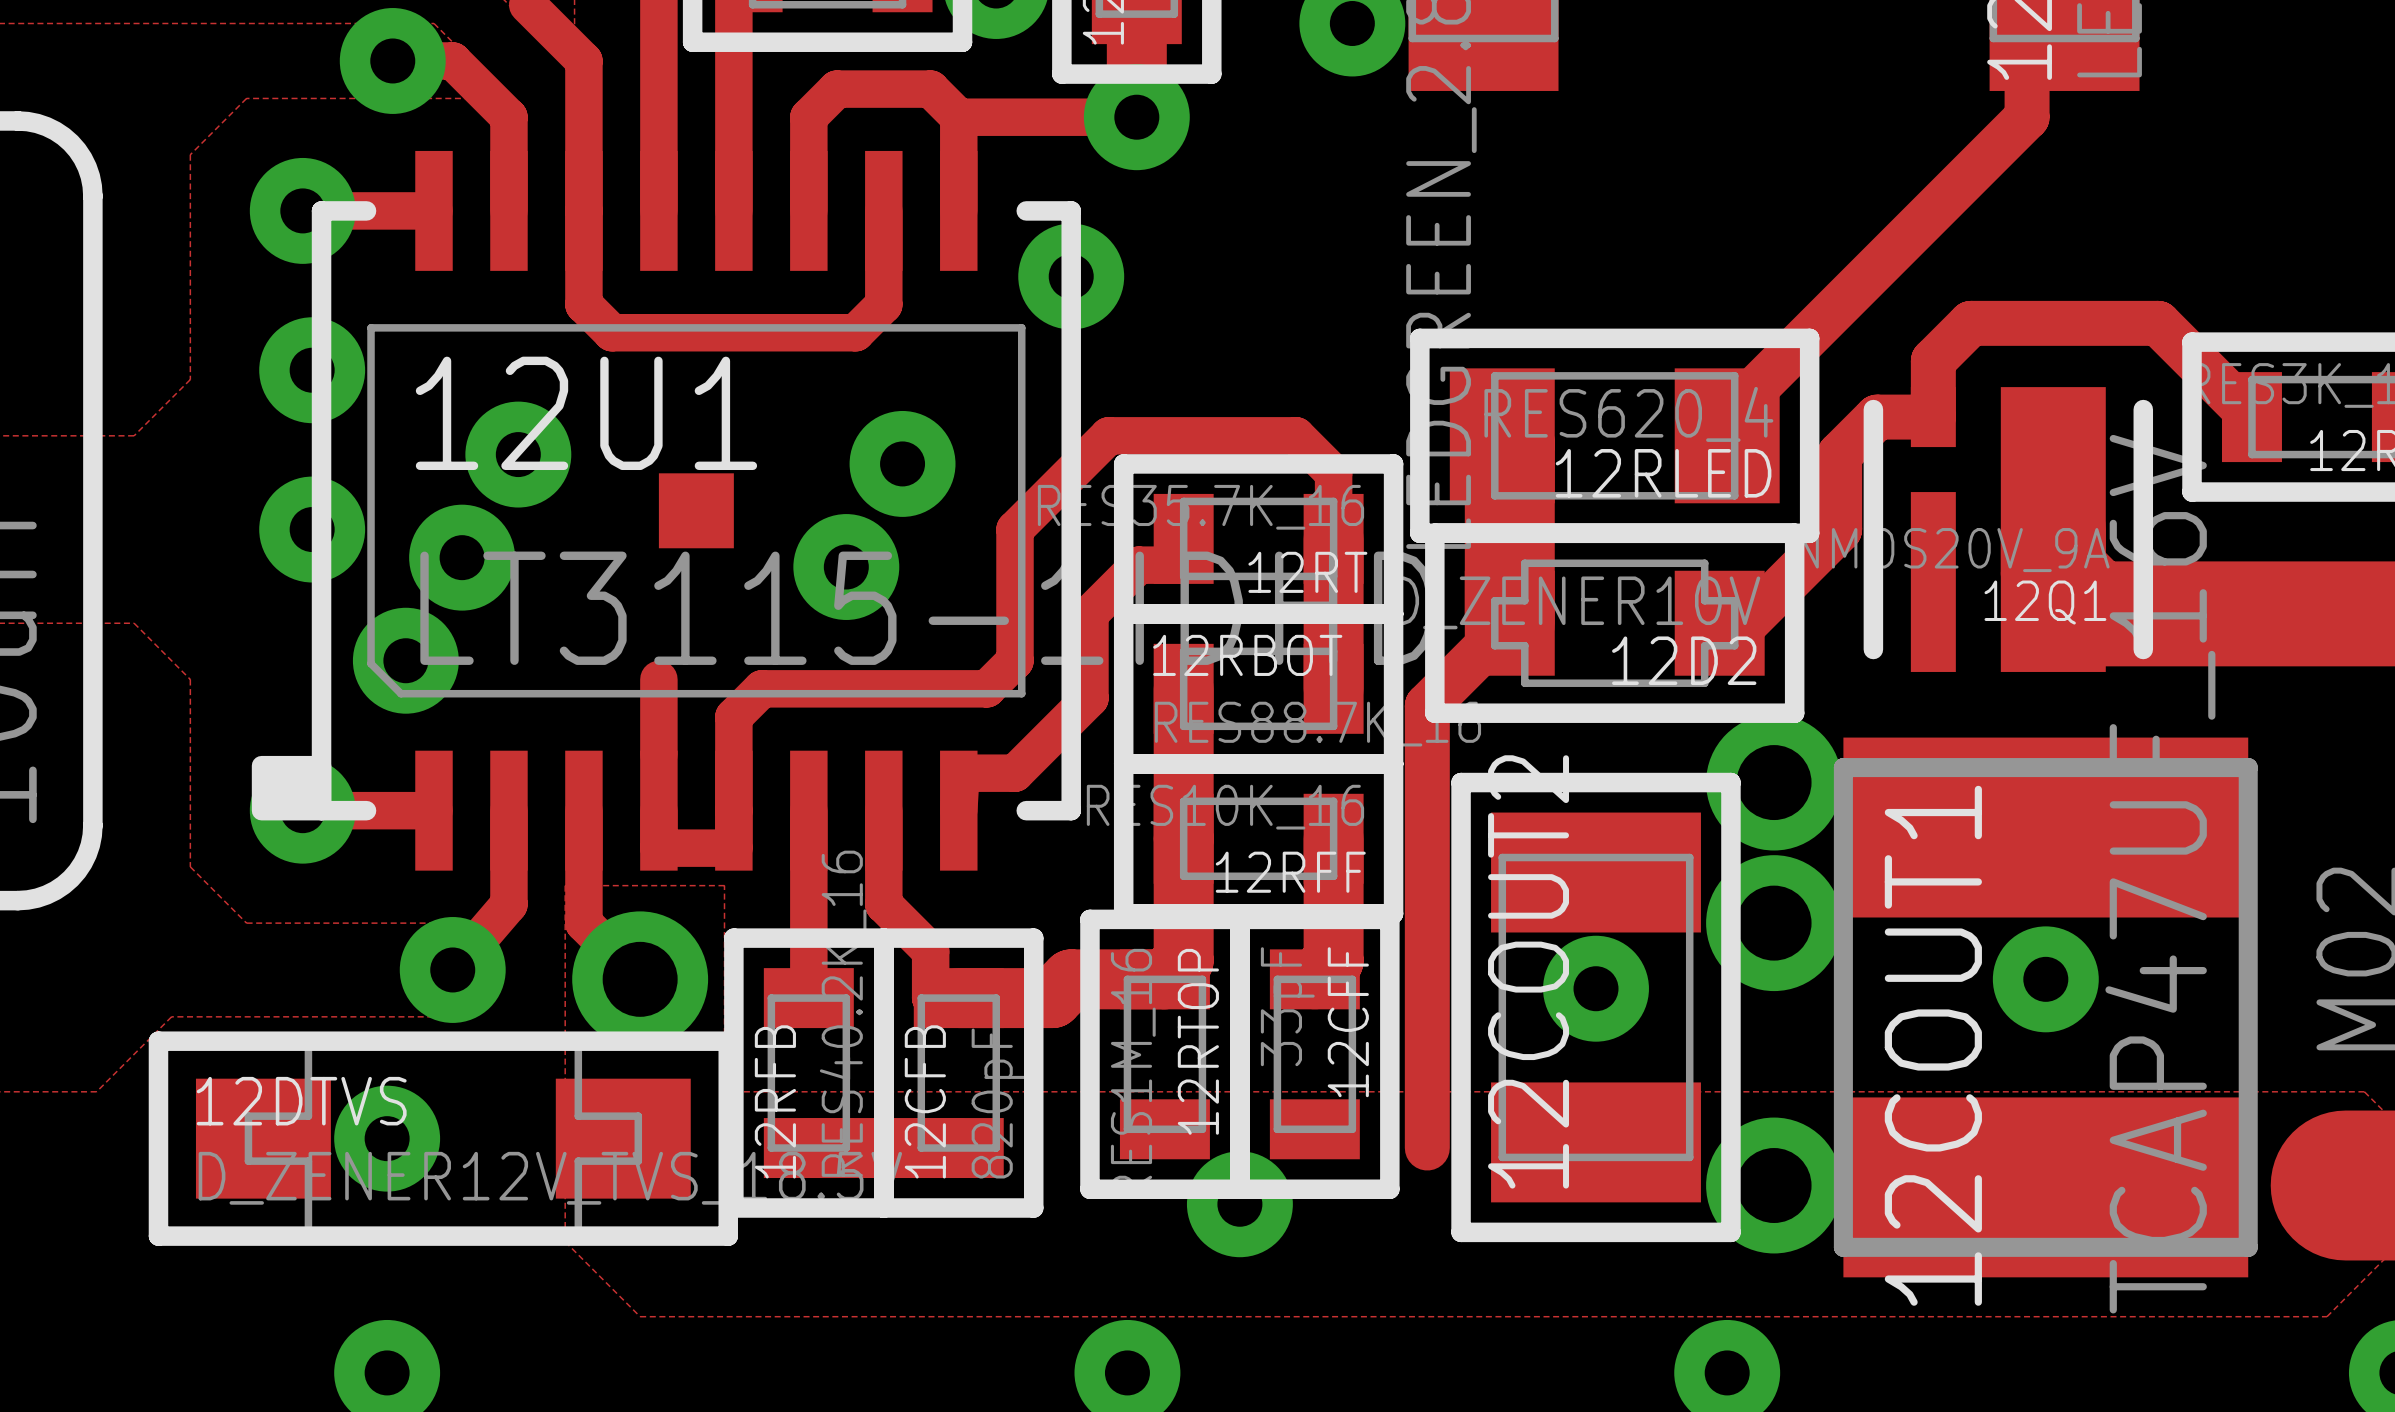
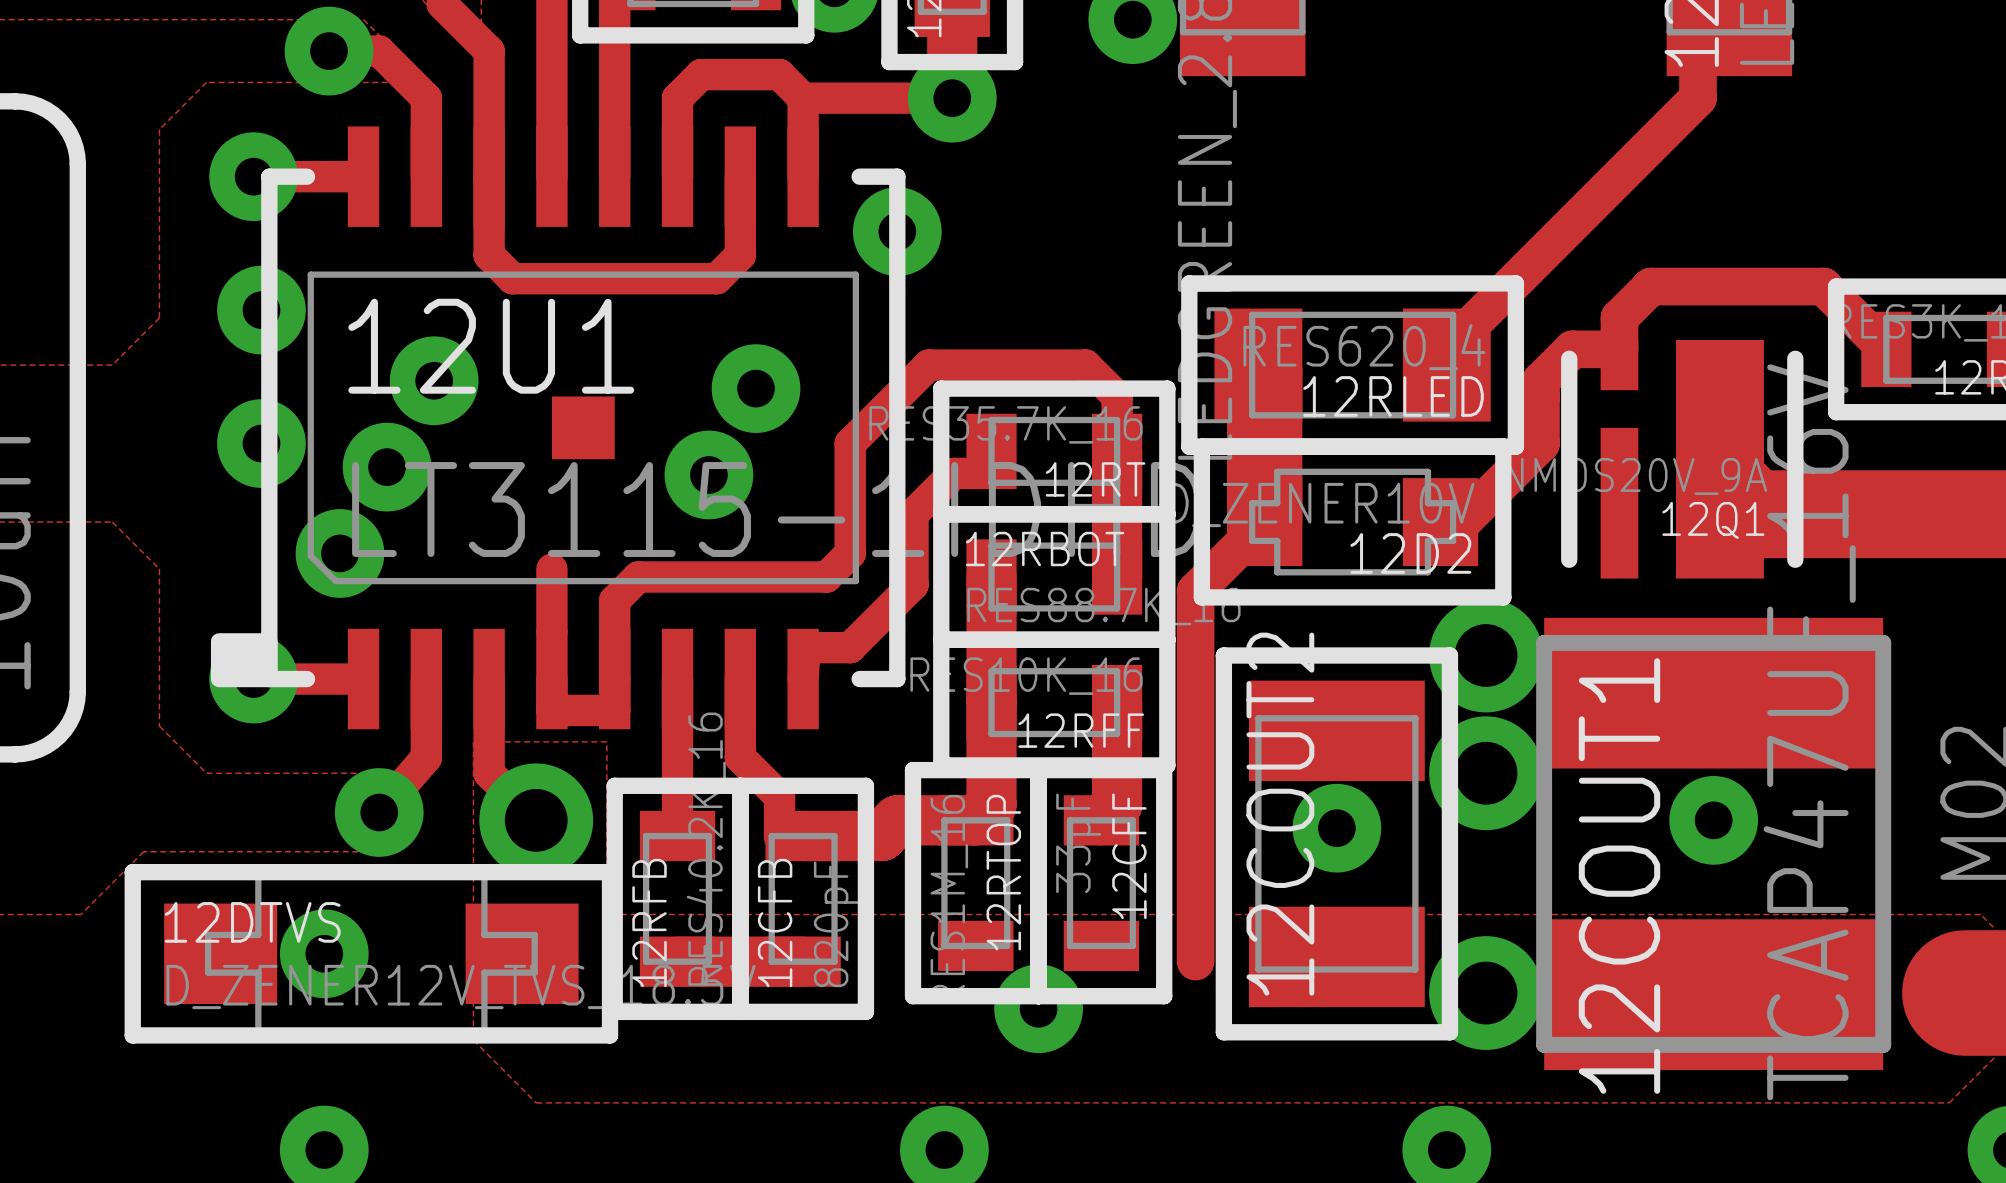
track: (2177, 342) (2158, 323) (1970, 323) (1933, 360) (1933, 379) -> (1823, 286) (1650, 286) (1619, 317)
12Q1 position: (2008, 529) -> (1682, 459)

